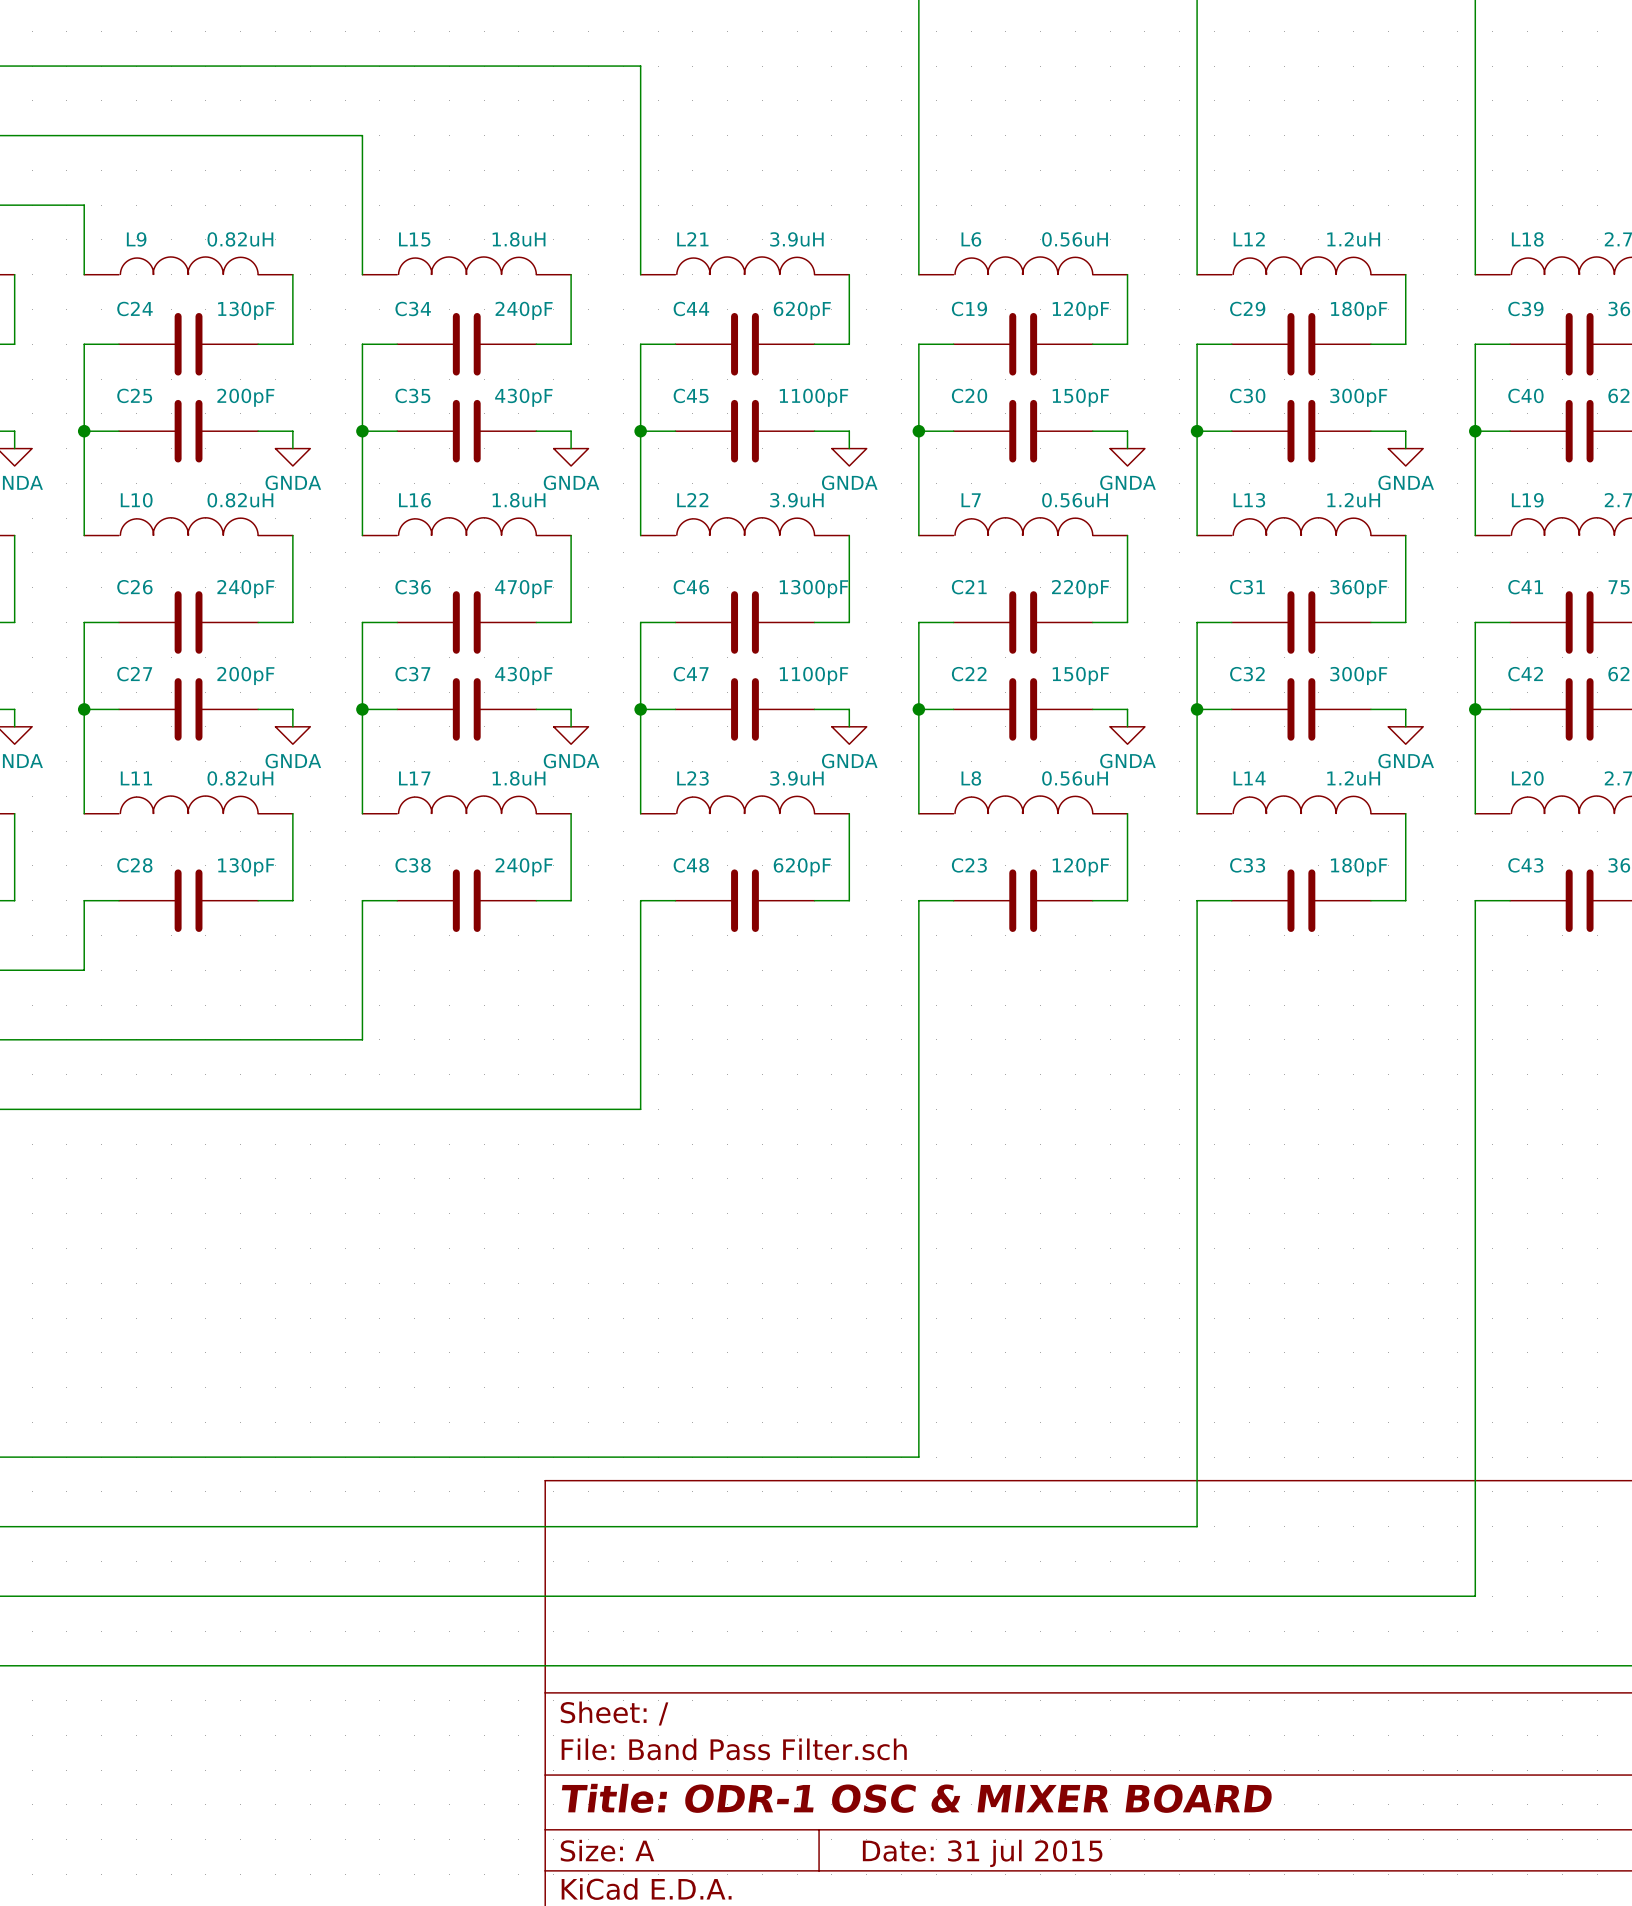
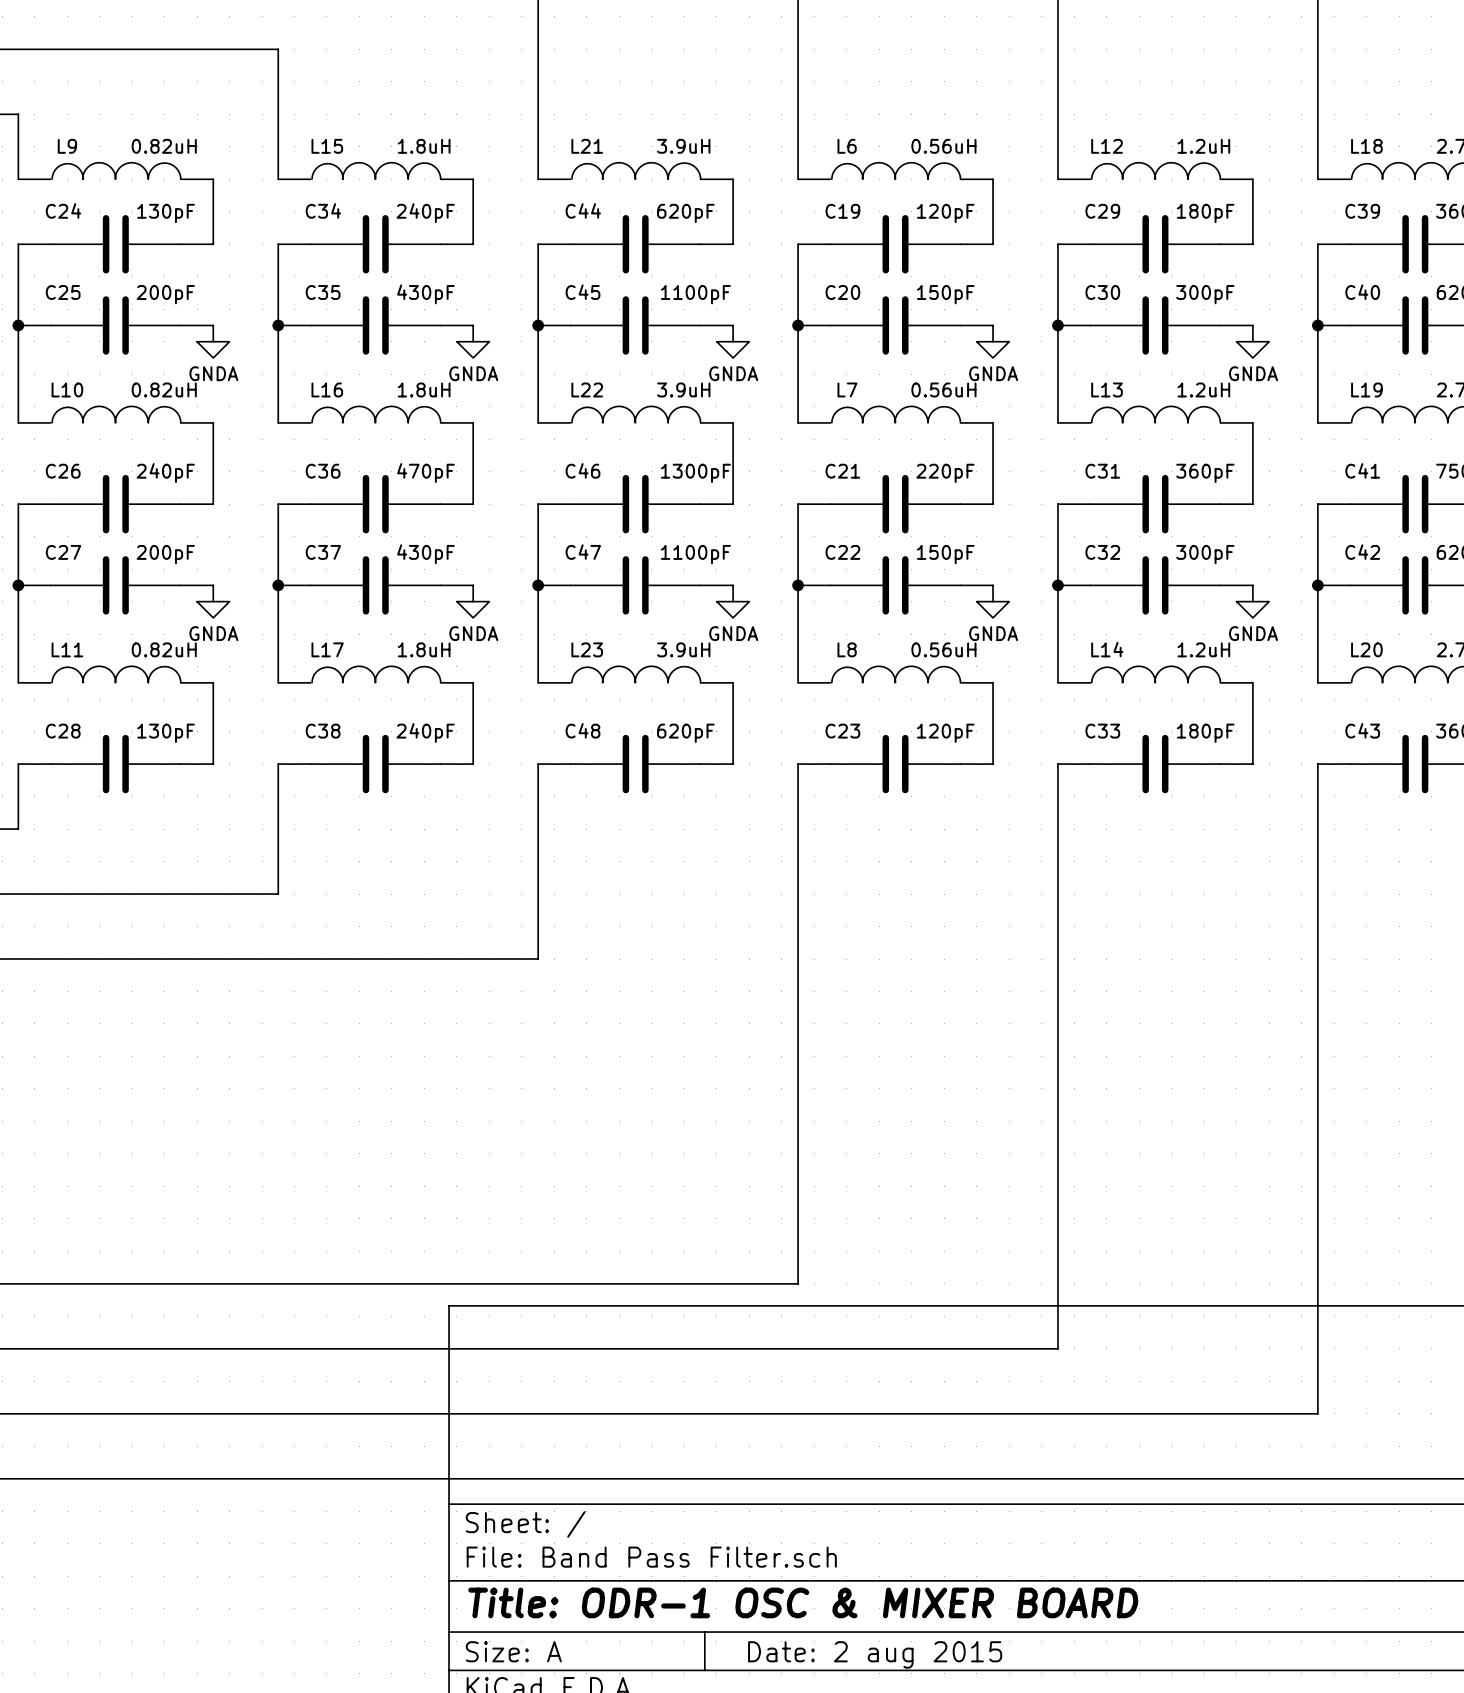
title block: Date: 31 jul 2015 (982, 1853) -> Date: 2 aug 2015 (875, 1654)

